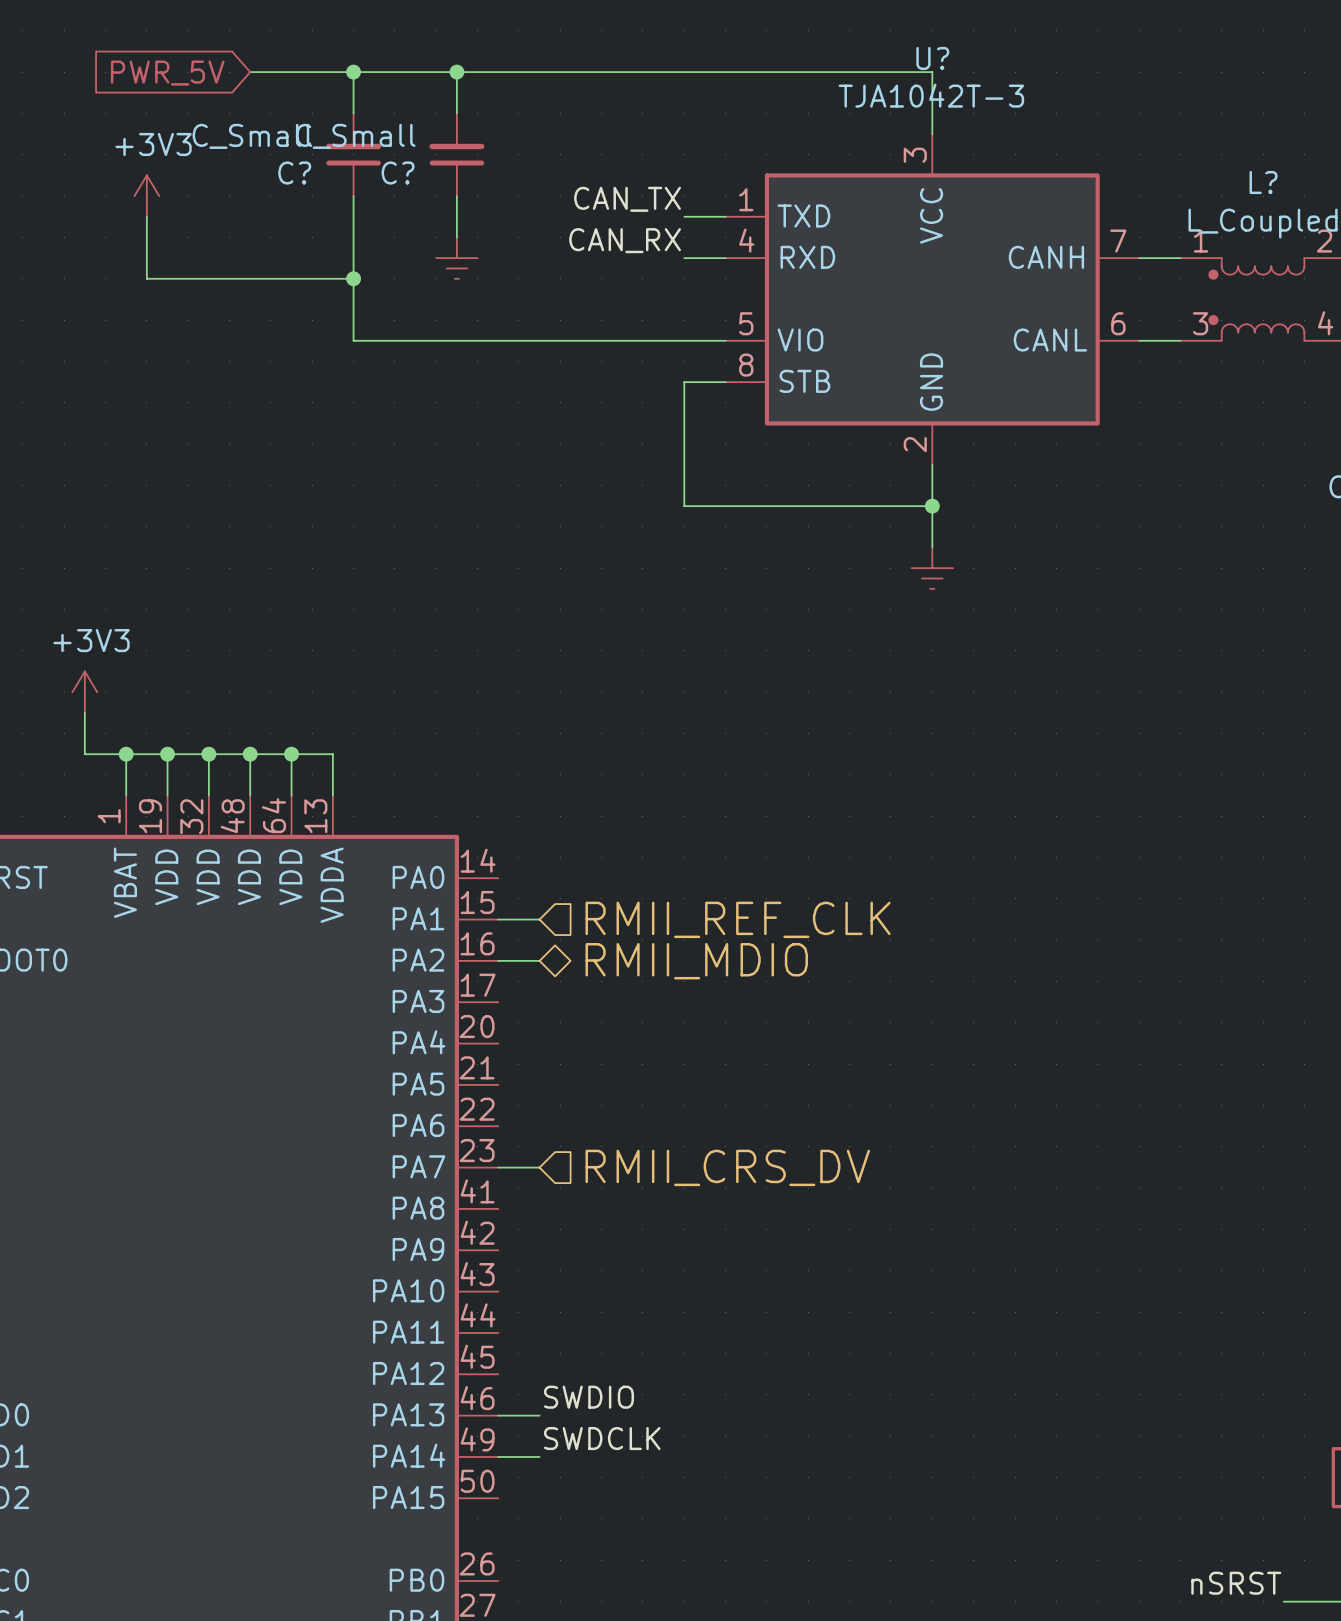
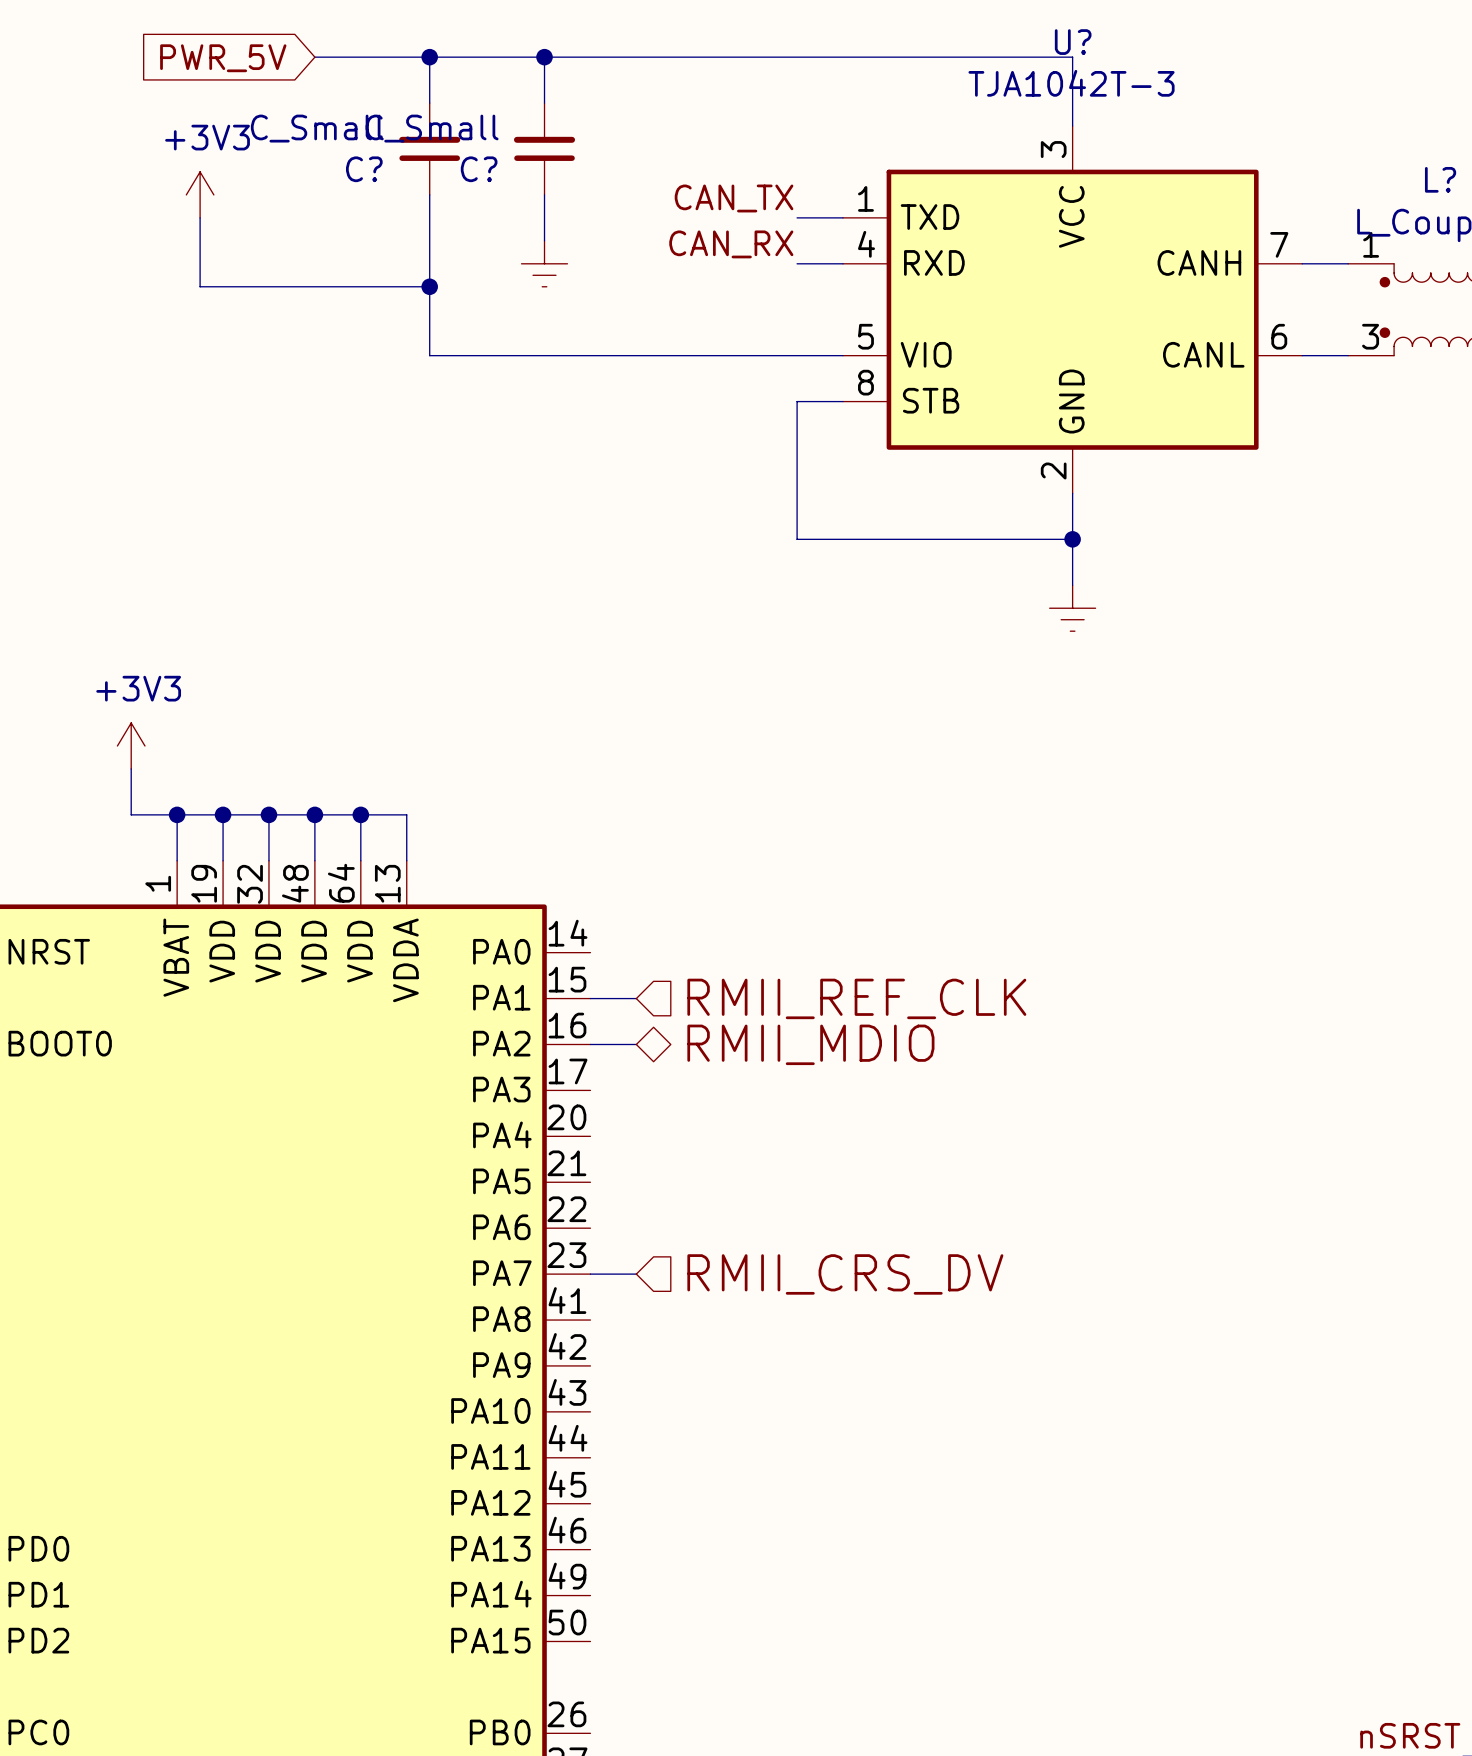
label: SWDIO (588, 1397) -> none
wire: (498, 1415) (539, 1415) -> none
label: SWDCLK (602, 1438) -> none
wire: (498, 1456) (539, 1456) -> none

